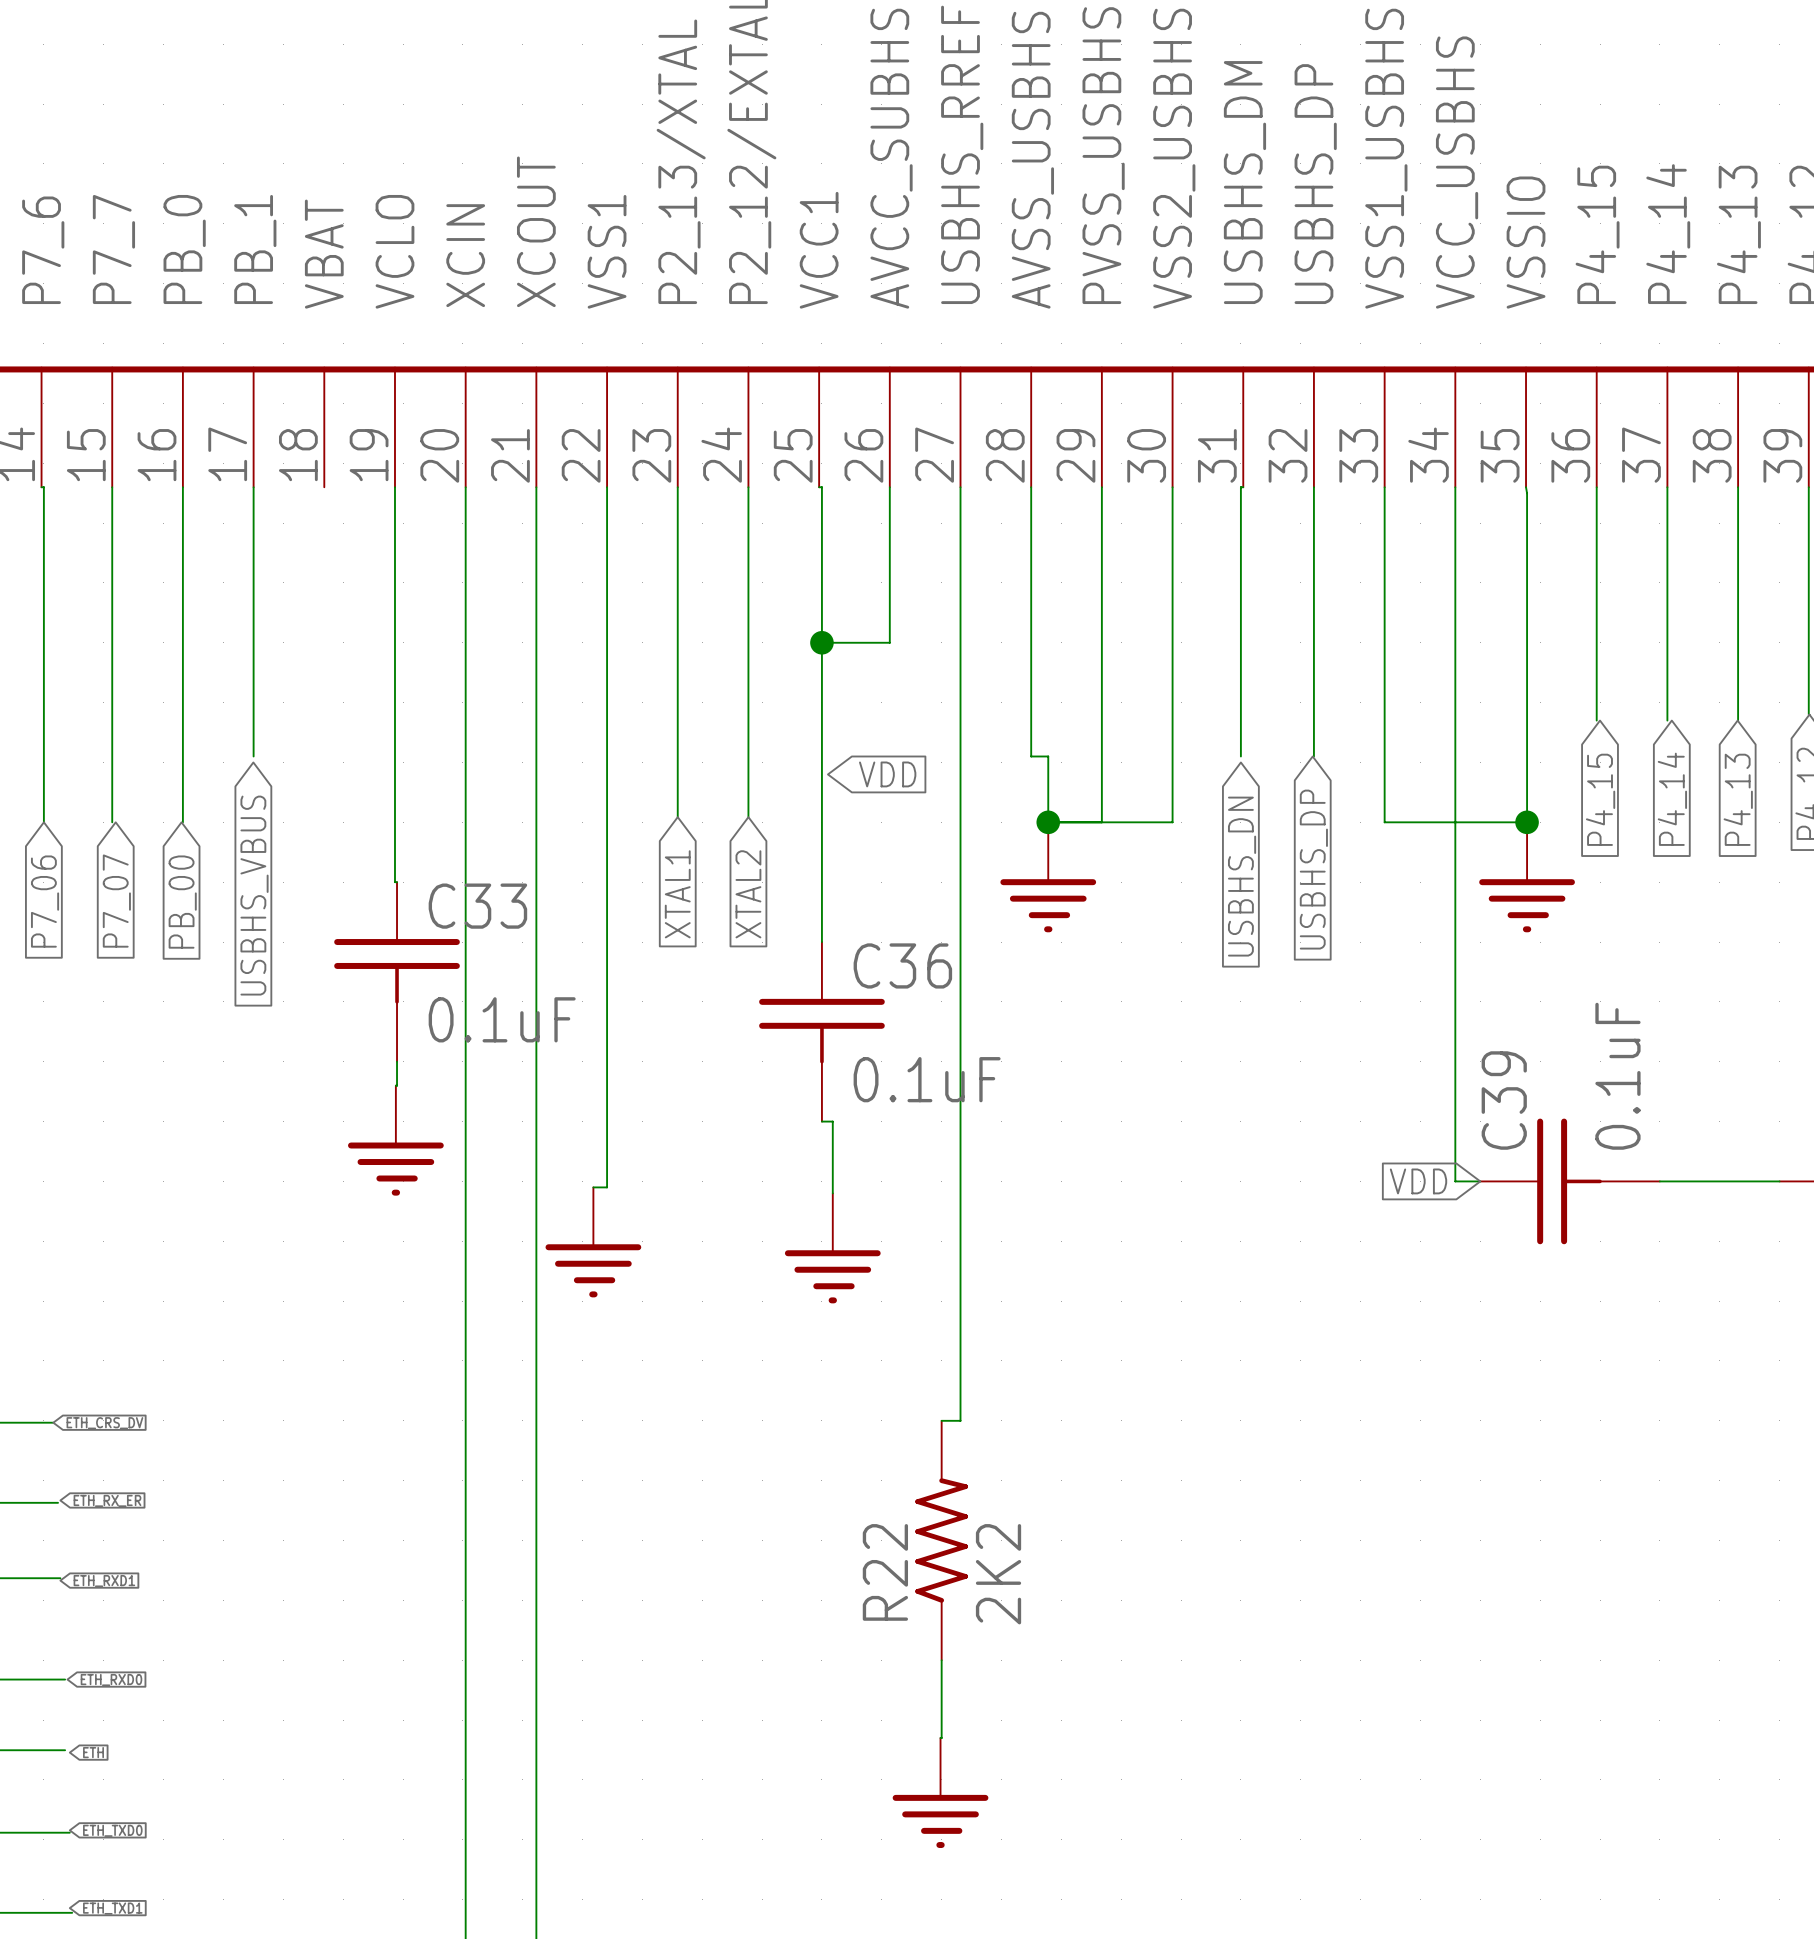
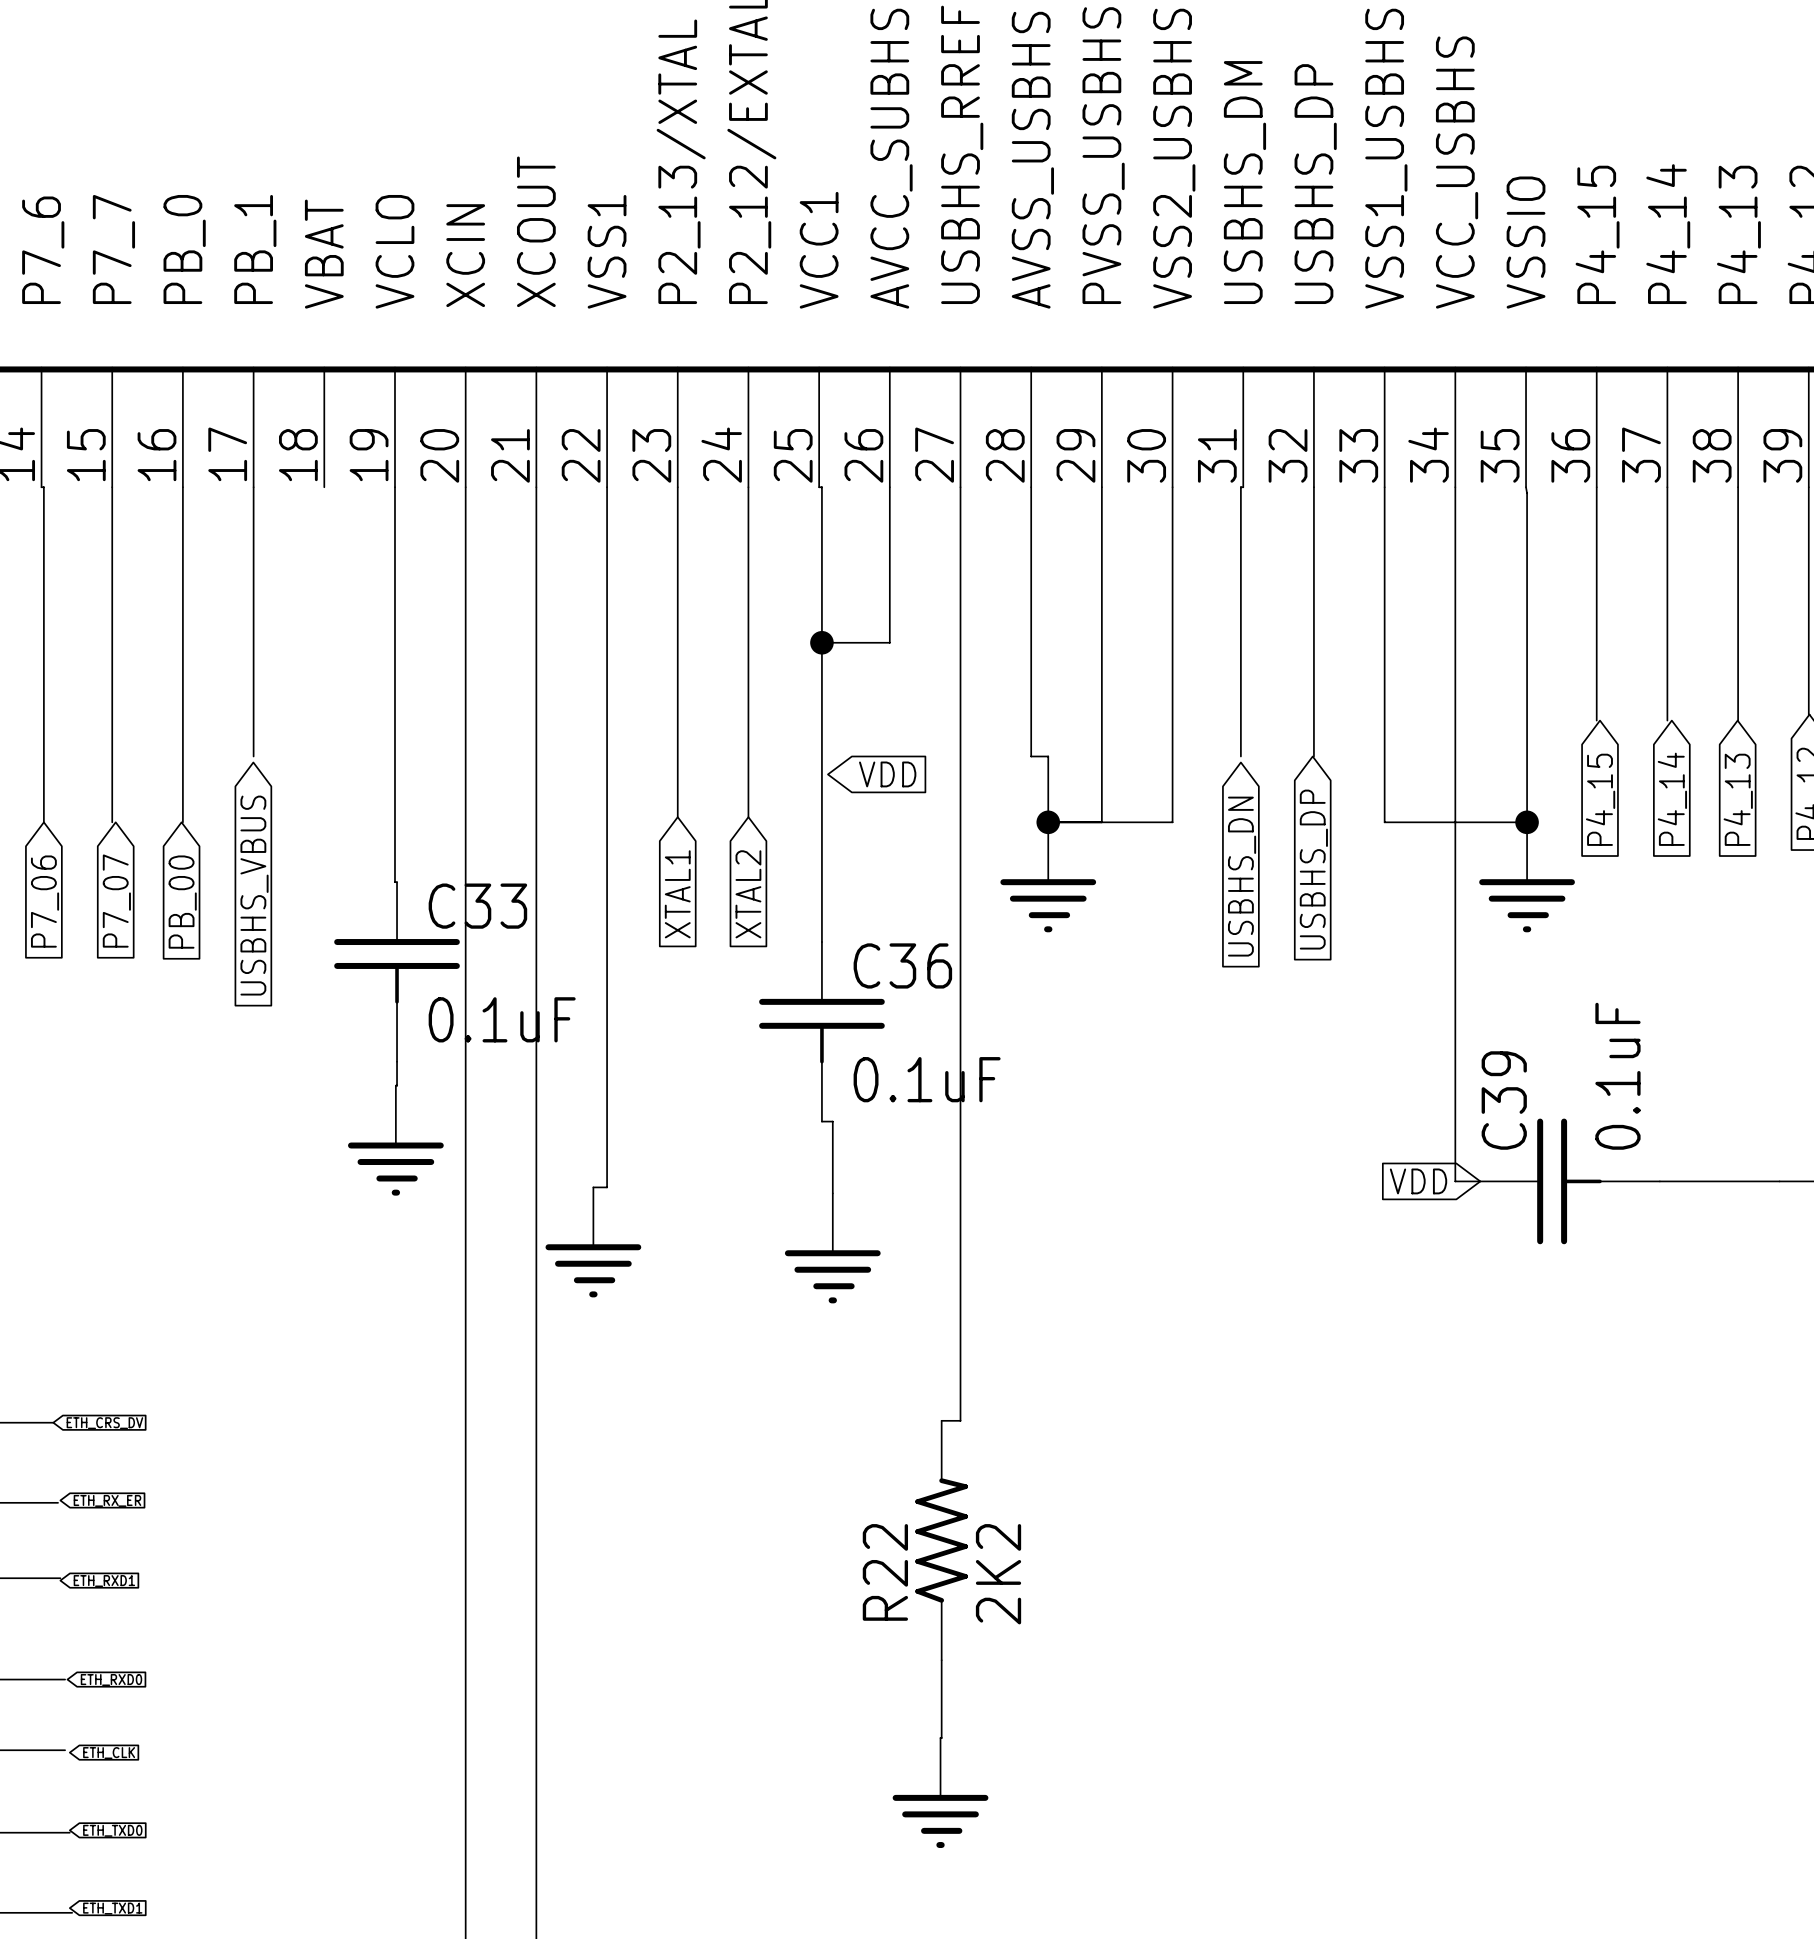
global label: ETH (93, 1752) -> ETH_CLK (109, 1753)

